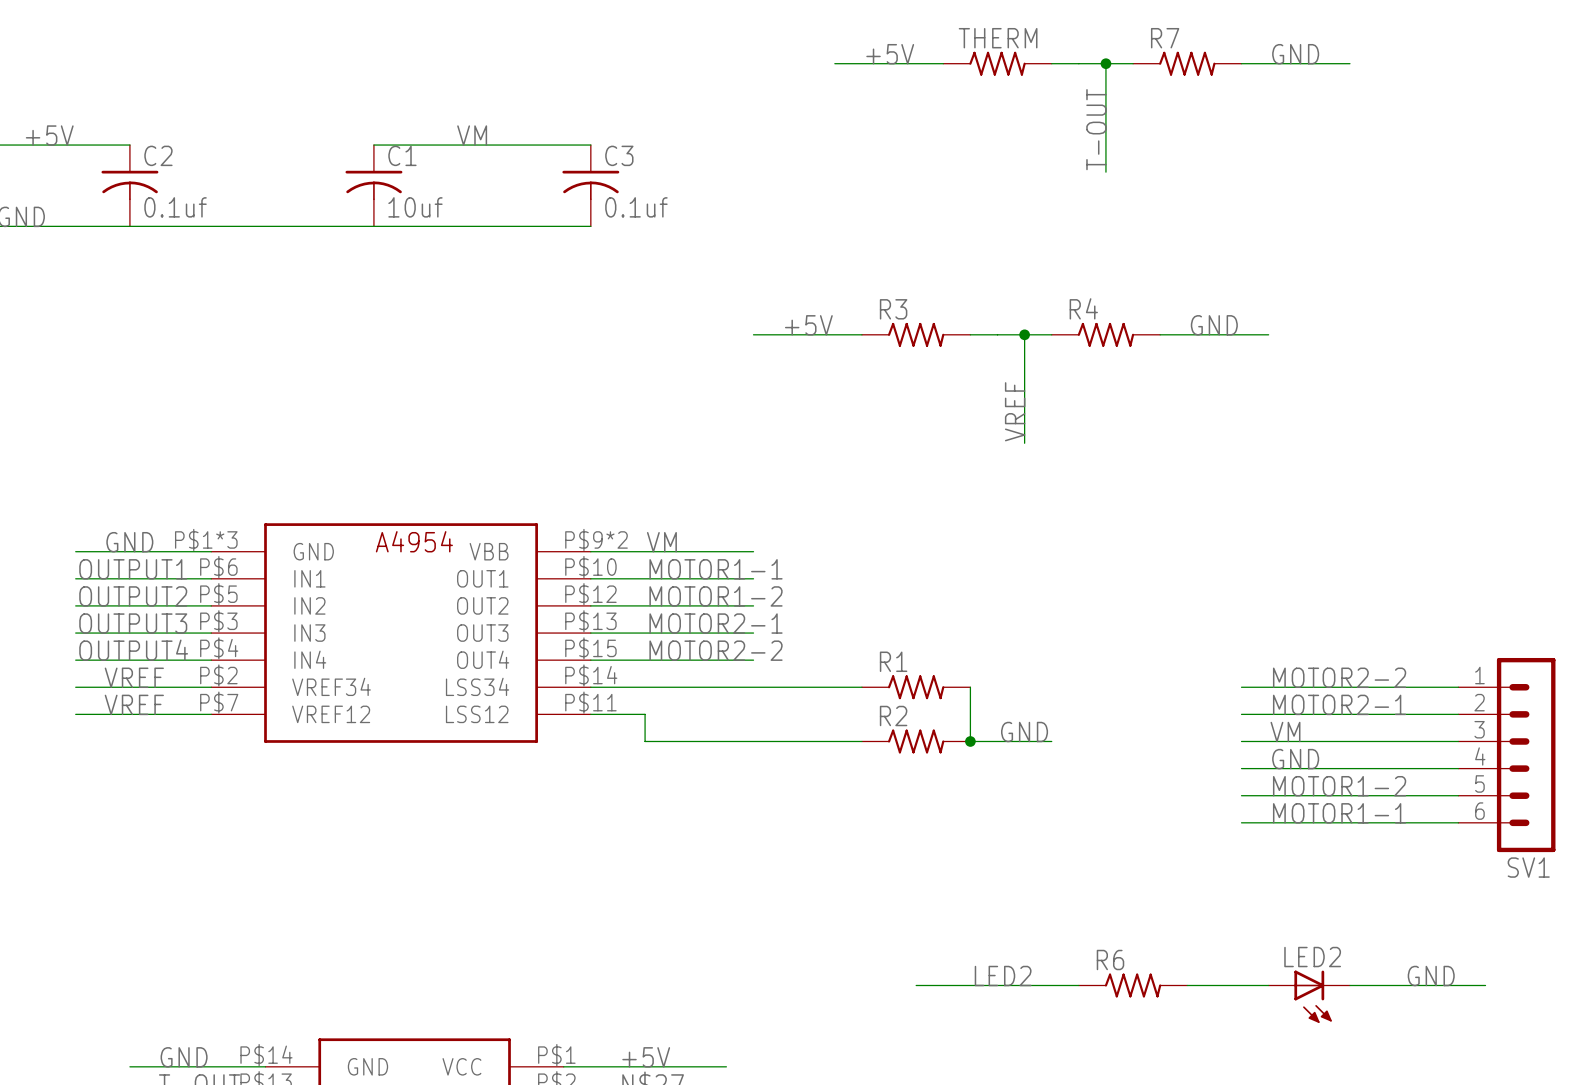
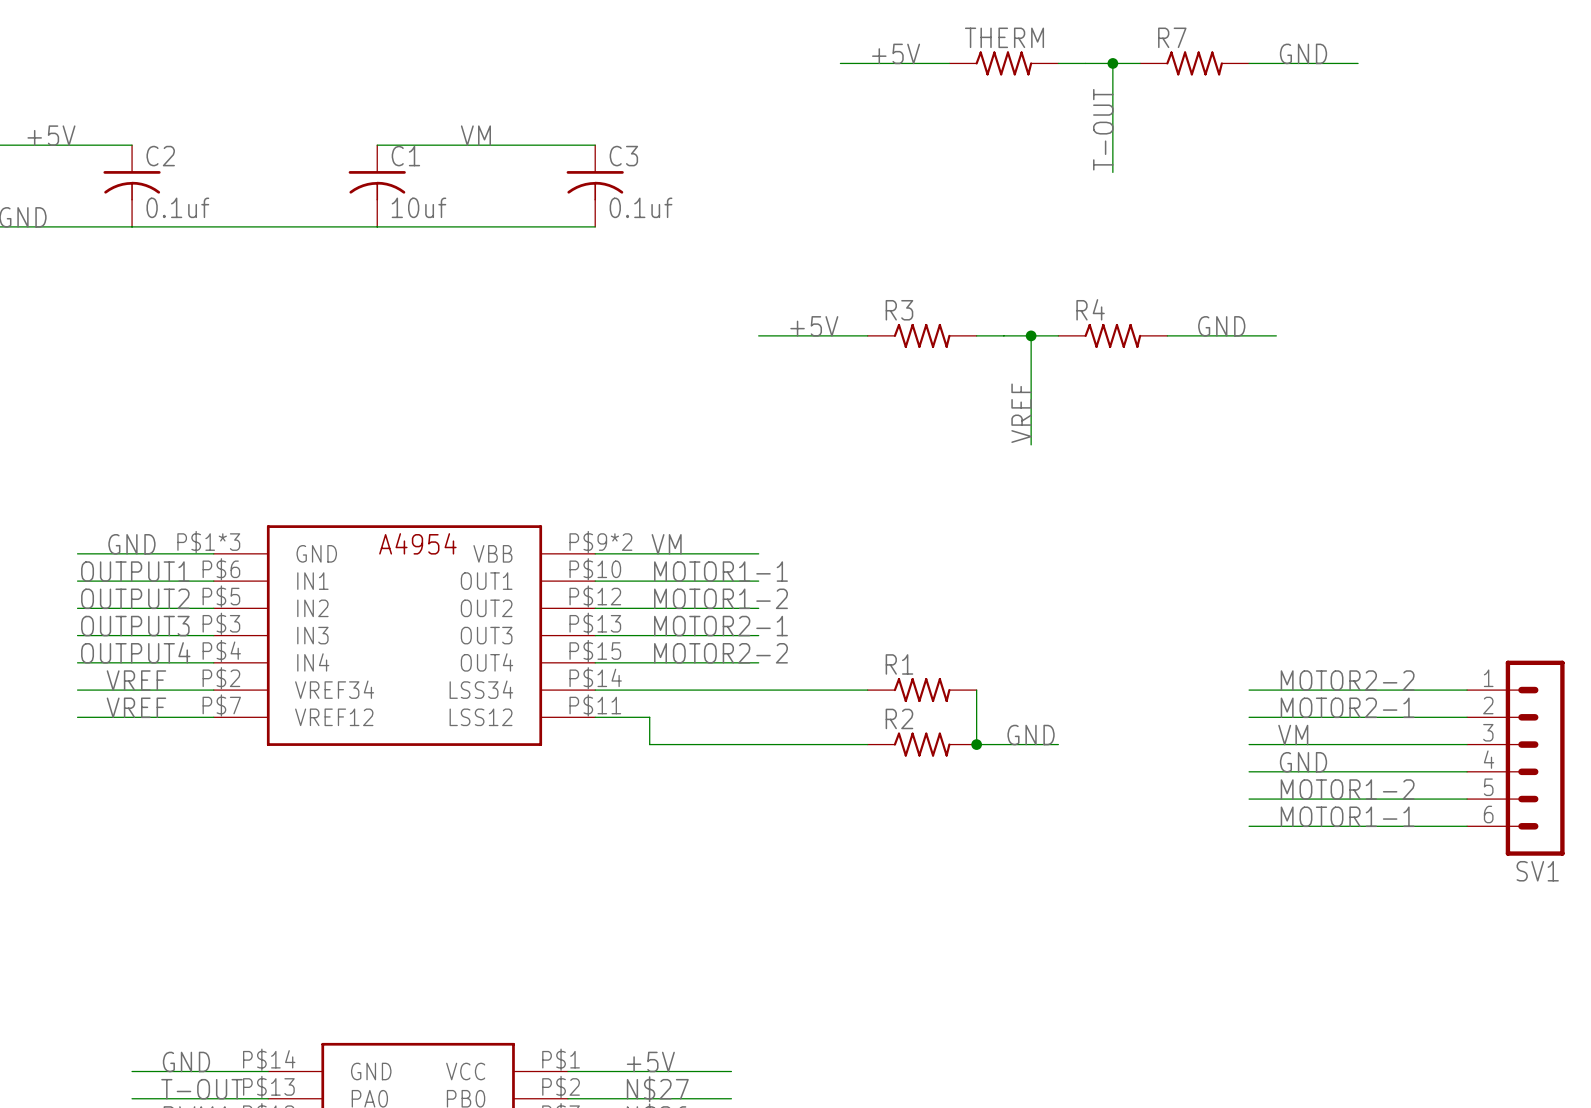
label: LED2 (1003, 976) -> none
label: GND (1431, 976) -> none
wire: (916, 985) (1078, 985) -> none
R6: (1133, 985) -> none
wire: (1187, 985) (1268, 985) -> none
wire: (1349, 985) (1485, 985) -> none
LED2: (1309, 996) -> none

